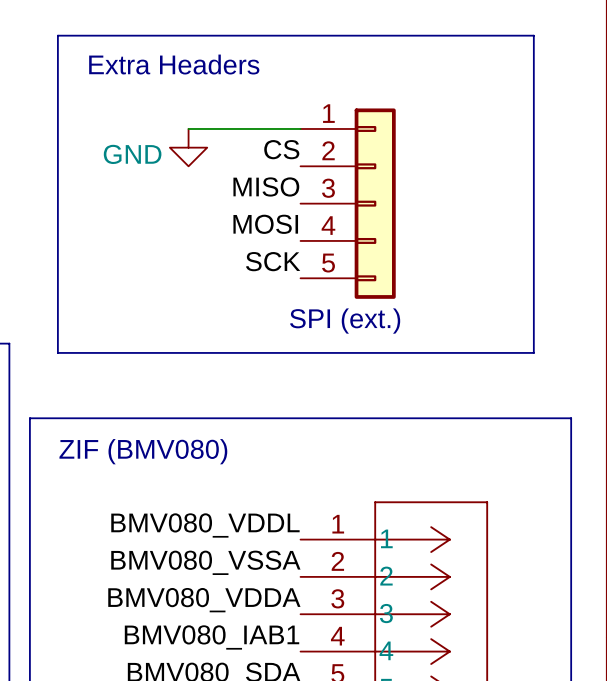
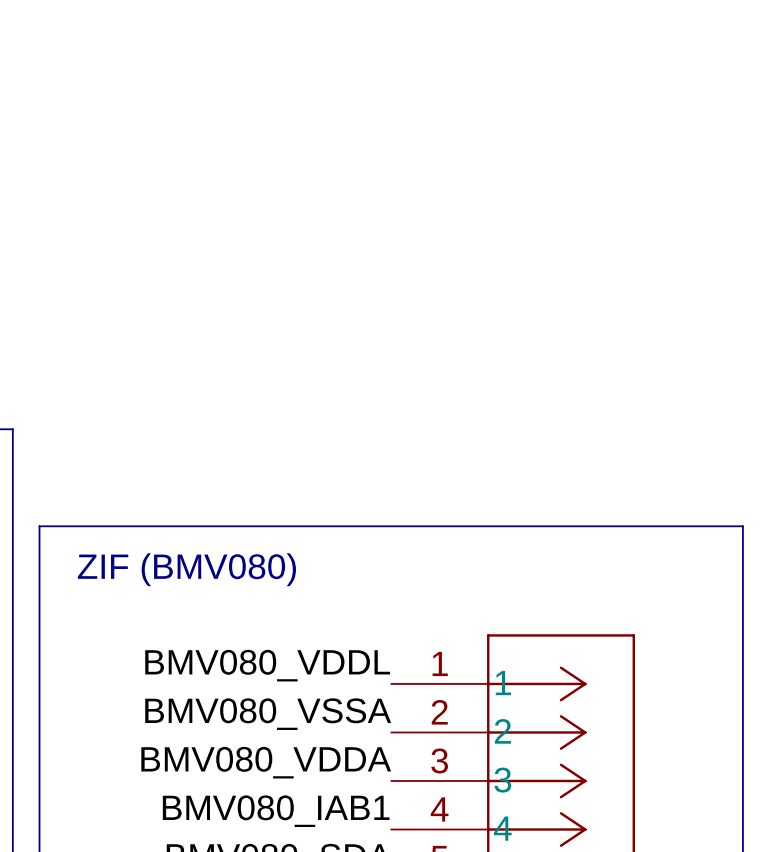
line: (57, 35) (533, 35) (533, 352) (57, 352) (57, 35) -> none
text: Extra Headers (174, 64) -> none
wire: (188, 128) (300, 128) -> none
power symbol: GND (188, 147) -> none
label: CS (281, 149) -> none
label: MISO (266, 186) -> none
part: (348, 203) -> none
label: MOSI (265, 224) -> none
label: SCK (273, 261) -> none
text: SPI (ext.) (345, 321) -> none

